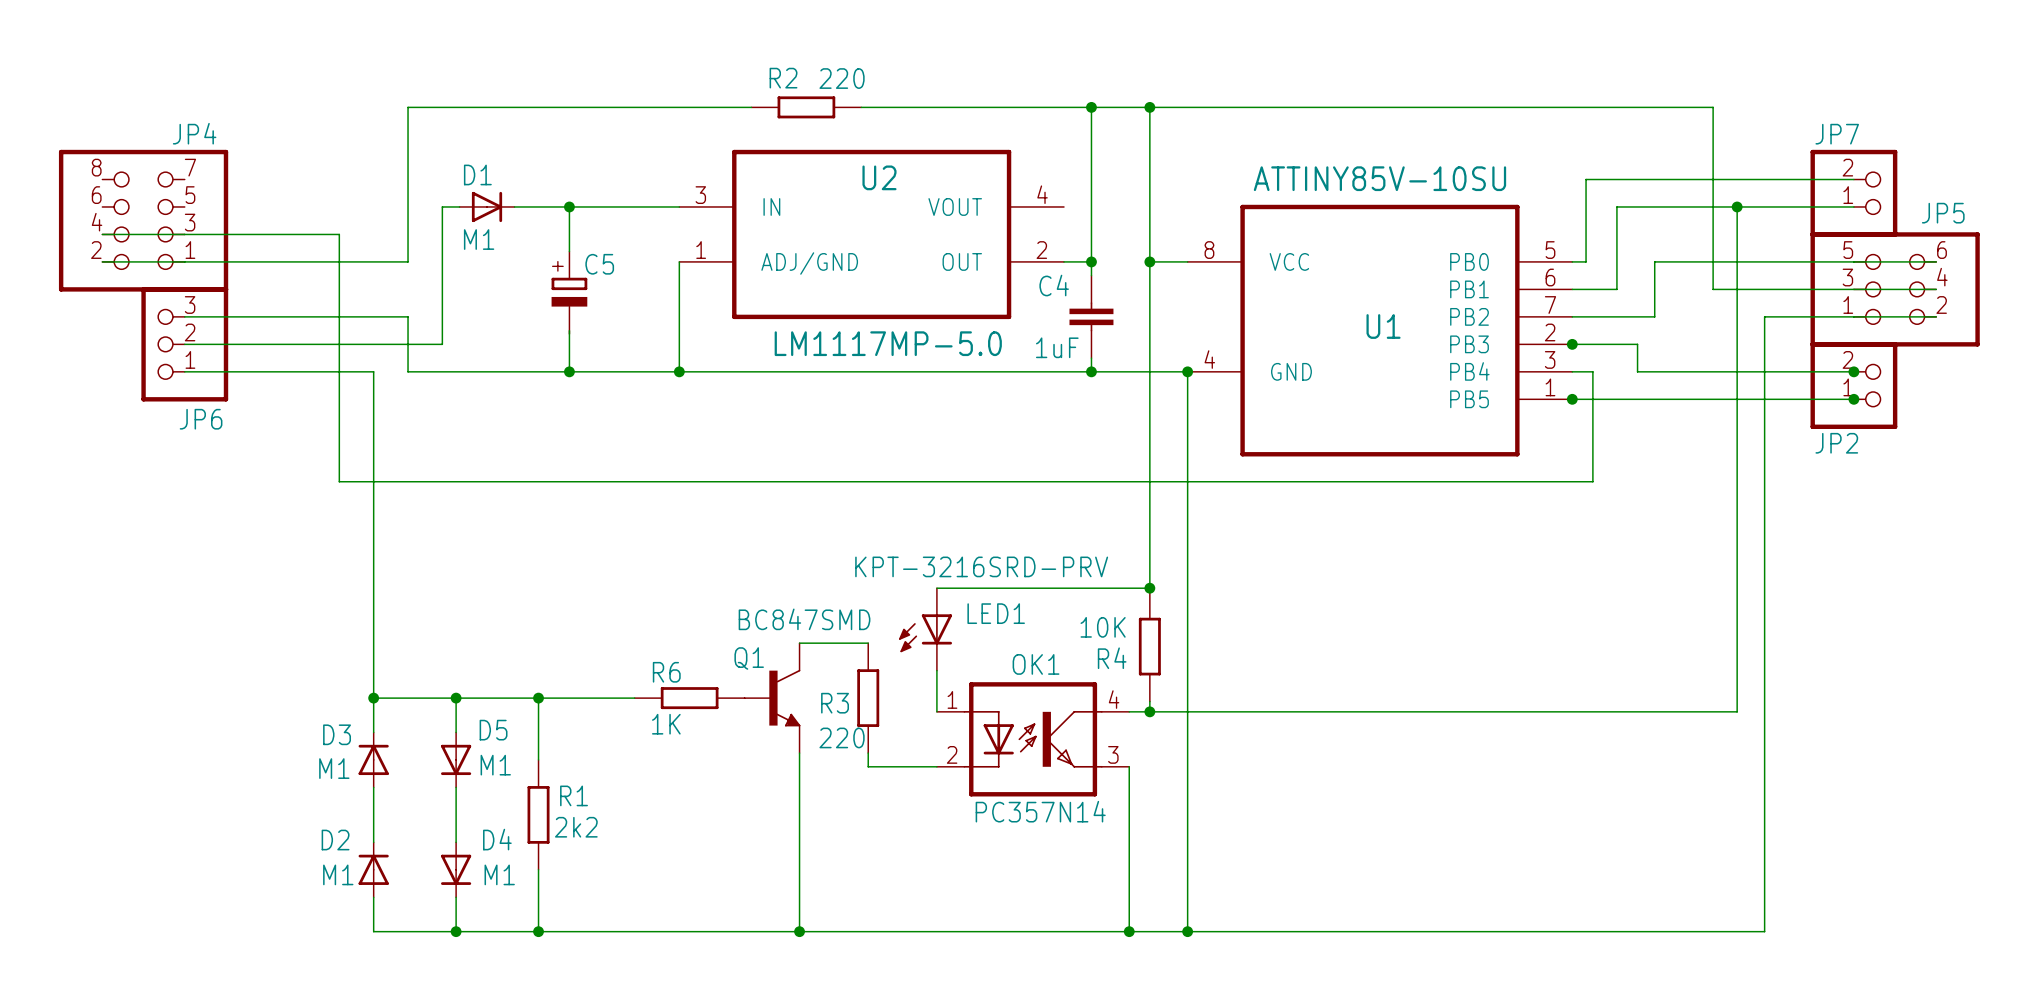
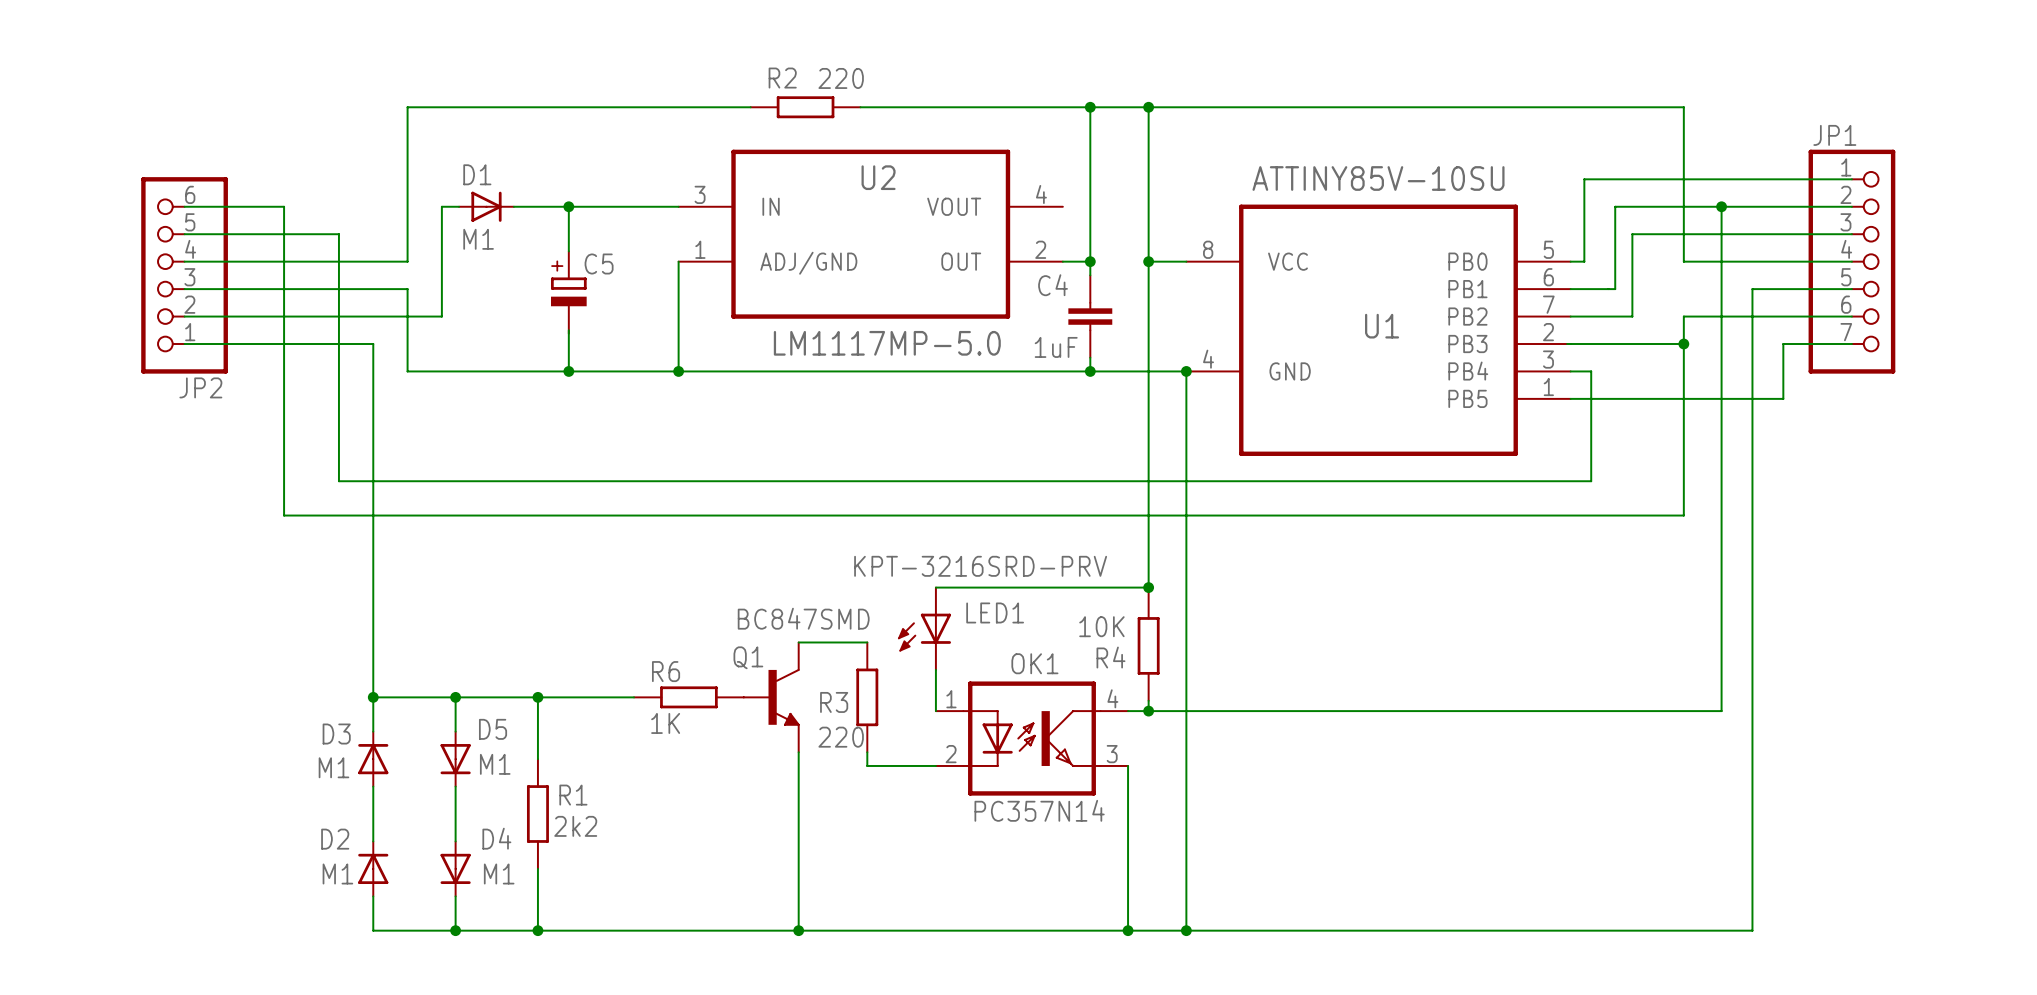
wire: (1685, 107) (1713, 107) (1713, 289) (1754, 289) -> (1683, 107) (1683, 261)
JP7: (1853, 193) -> none
wire: none -> (184, 206) (284, 206) (284, 515) (1683, 515) (1683, 316) (1762, 316)
wire: (1737, 206) (1737, 711) (1723, 711) -> (1721, 206) (1721, 711)
junction position: (1737, 206) -> (1721, 206)
JP4: (143, 220) -> none
wire: (102, 234) (184, 234) -> none
wire: (102, 261) (184, 261) -> none
wire: (1685, 261) (1654, 261) (1654, 316) (1634, 316) -> (1851, 234) (1632, 234) (1632, 316)
wire: (1853, 261) (1936, 261) -> none
JP1: none -> (1851, 261)
wire: none -> (184, 289) (407, 289) (407, 316) (441, 316)
wire: (1853, 289) (1936, 289) -> none
JP5: (1895, 289) -> none
wire: (442, 316) (442, 344) (373, 344) -> (373, 371) (373, 344)
wire: (1764, 316) (1764, 931) (1754, 931) -> (1752, 289) (1752, 930)
wire: (1853, 316) (1936, 316) -> none
JP2 symbol: [1810, 342, 1898, 429] -> [141, 177, 228, 374]
JP6: (184, 344) -> none
junction: (1572, 344) -> none
wire: (1637, 344) (1637, 371) (1857, 371) -> (1635, 344) (1683, 344)
junction: none -> (1683, 344)
wire: (184, 371) (373, 371) -> none
junction: (1853, 371) -> none
junction: (1572, 399) -> none
wire: (1785, 399) (1853, 399) -> (1783, 398) (1783, 344) (1851, 344)
junction: (1853, 399) -> none
JP2 name position: JP2 (1836, 443) -> JP2 (200, 387)

